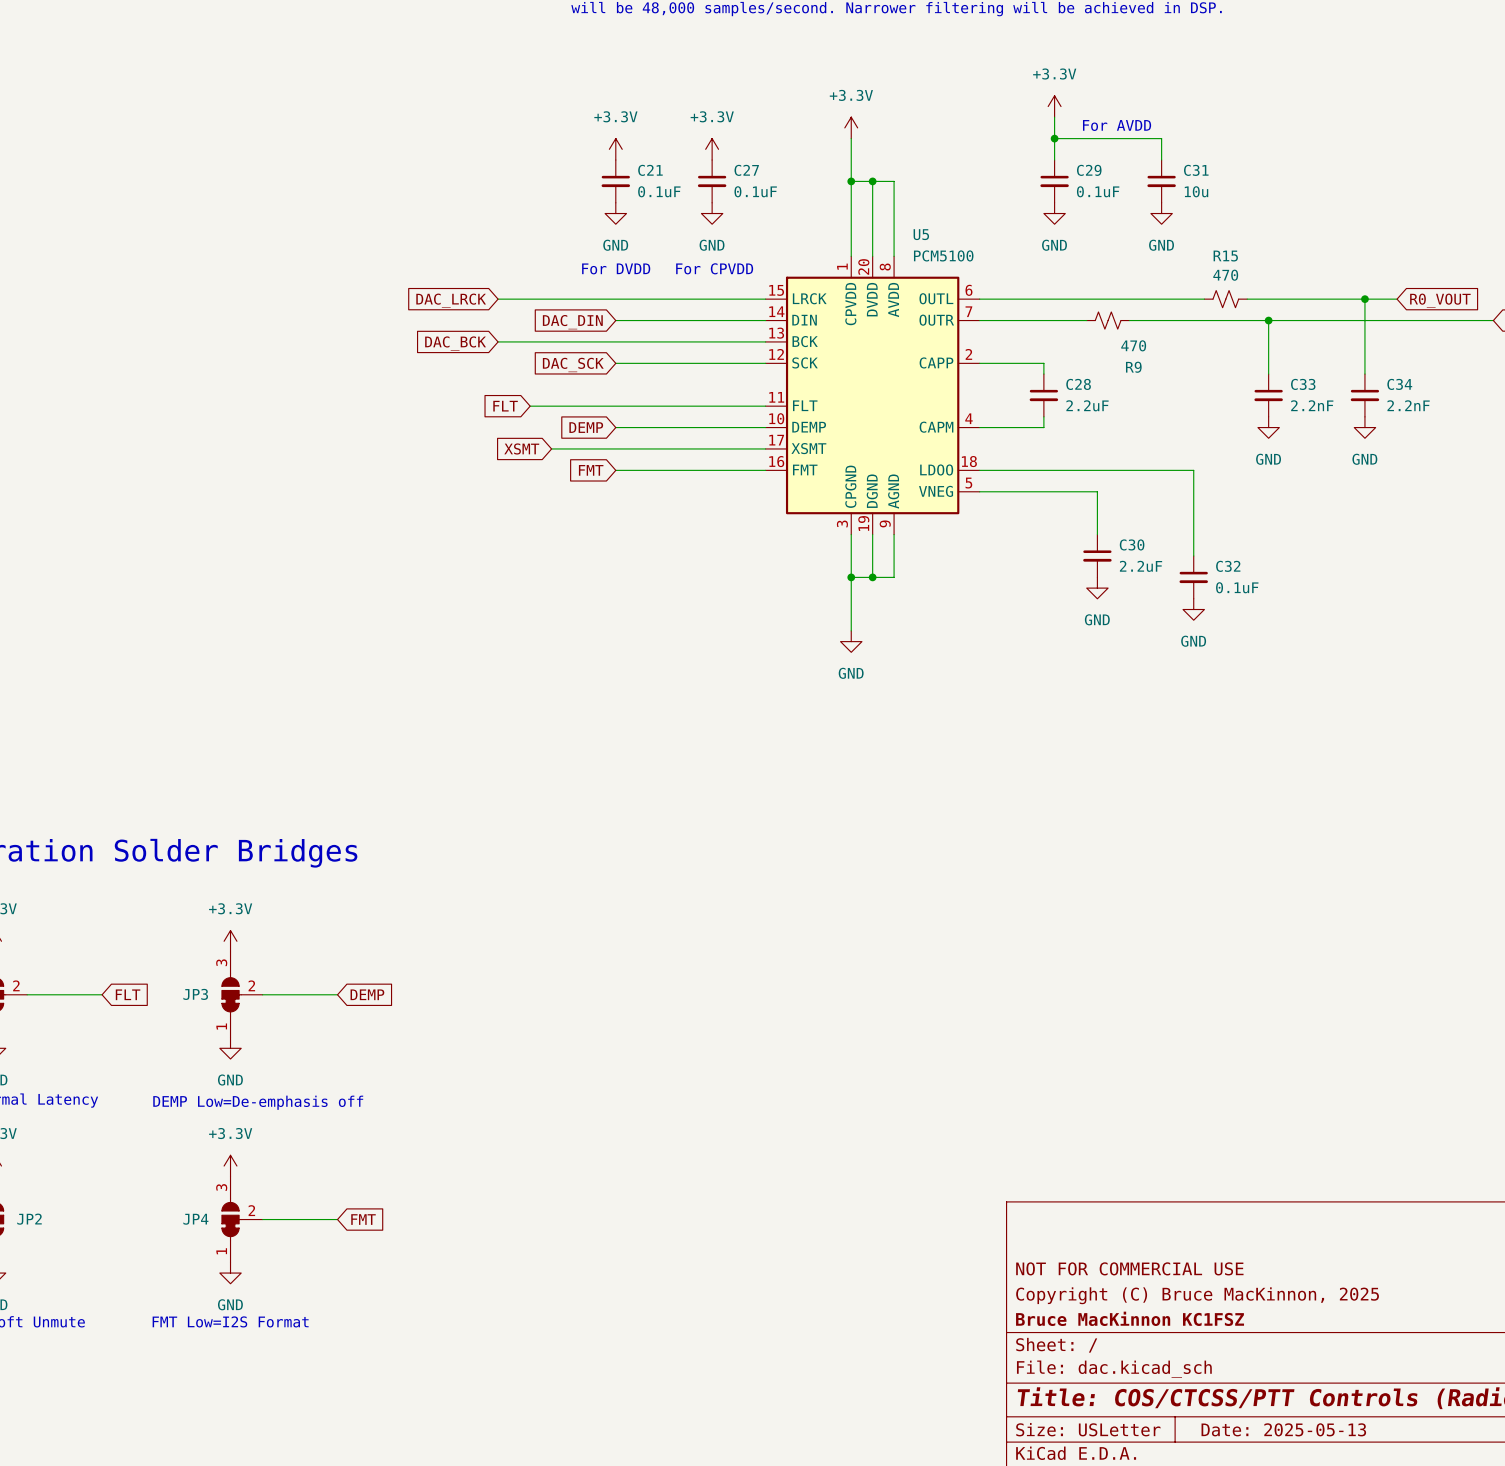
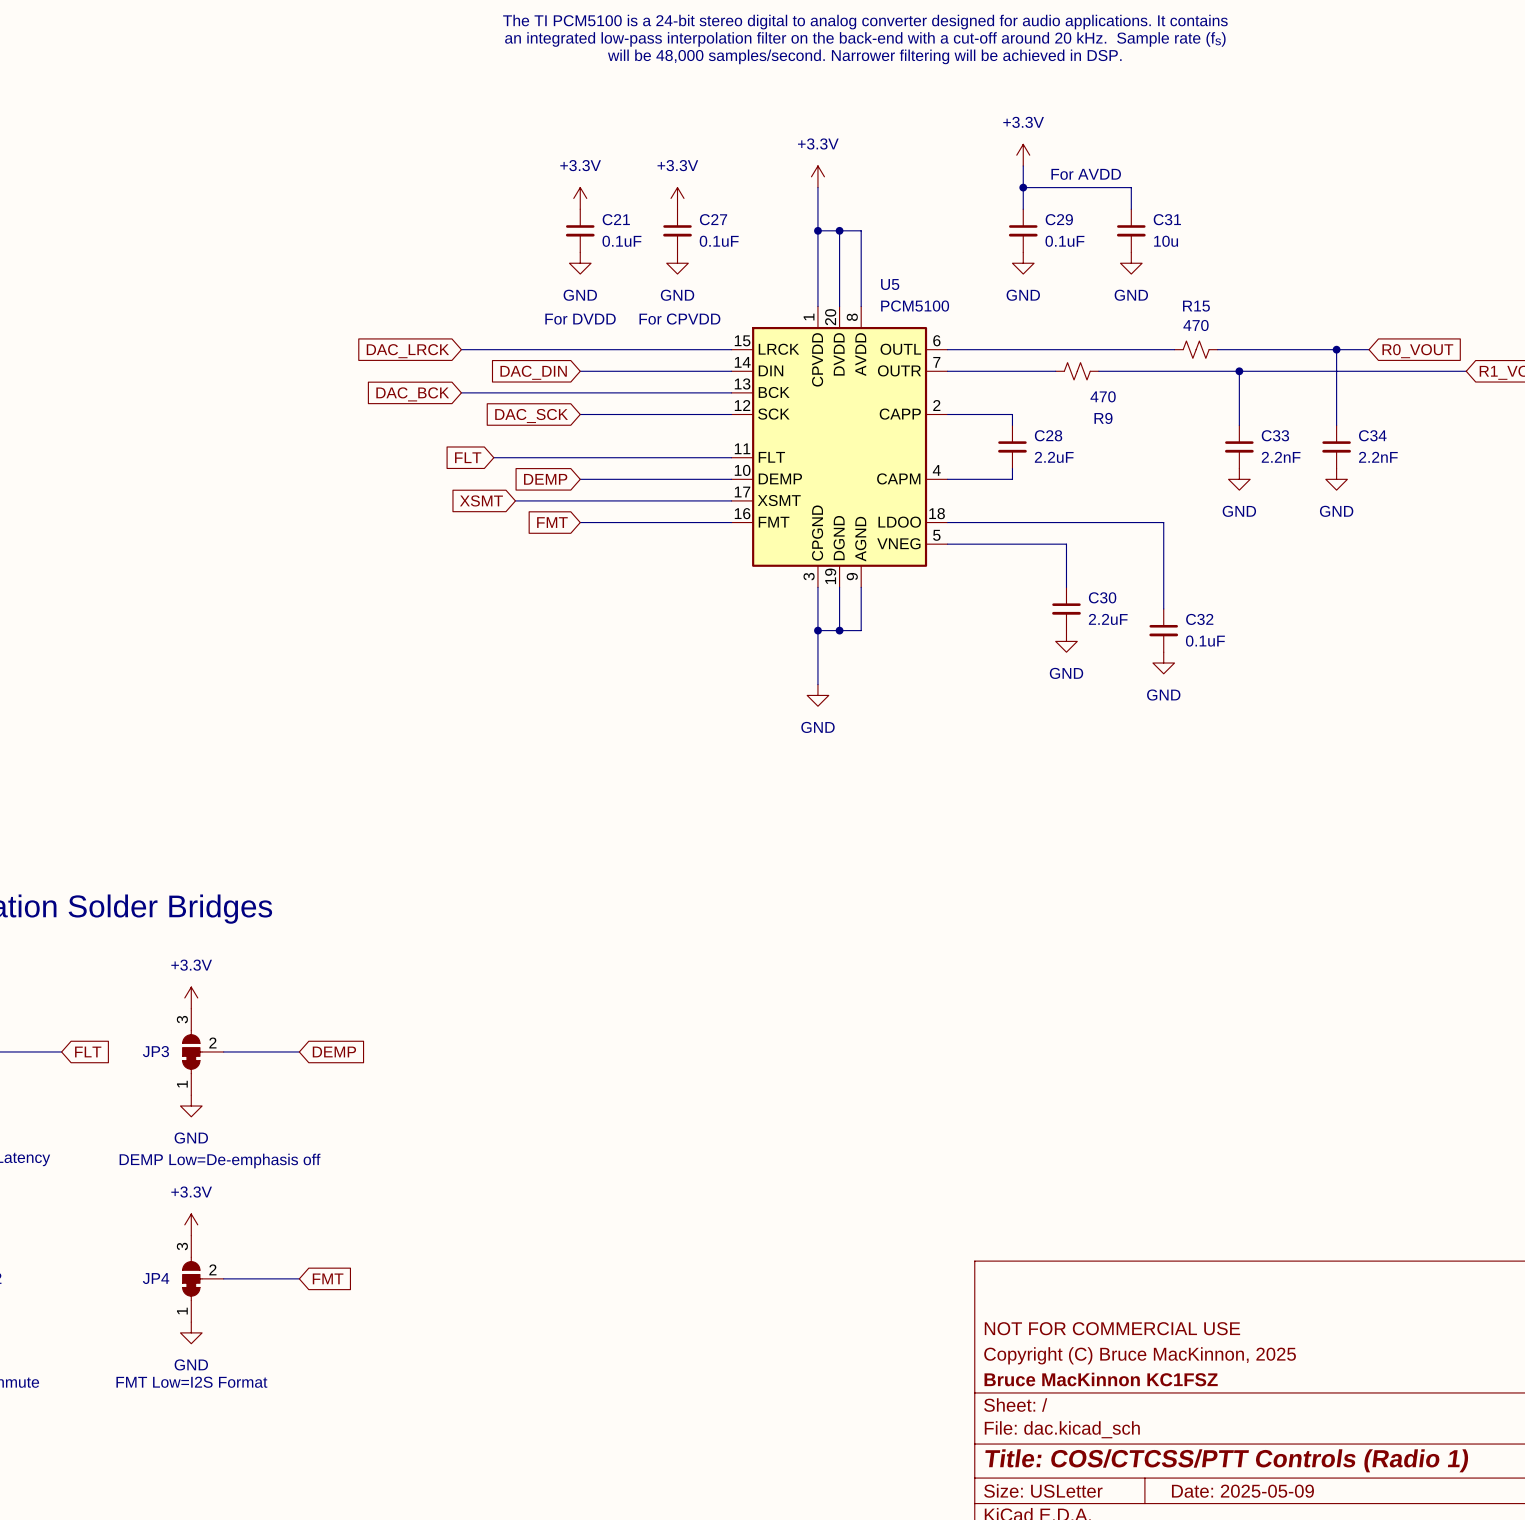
title block: Date: 2025-05-13 (1283, 1429) -> Date: 2025-05-09 (1242, 1491)

